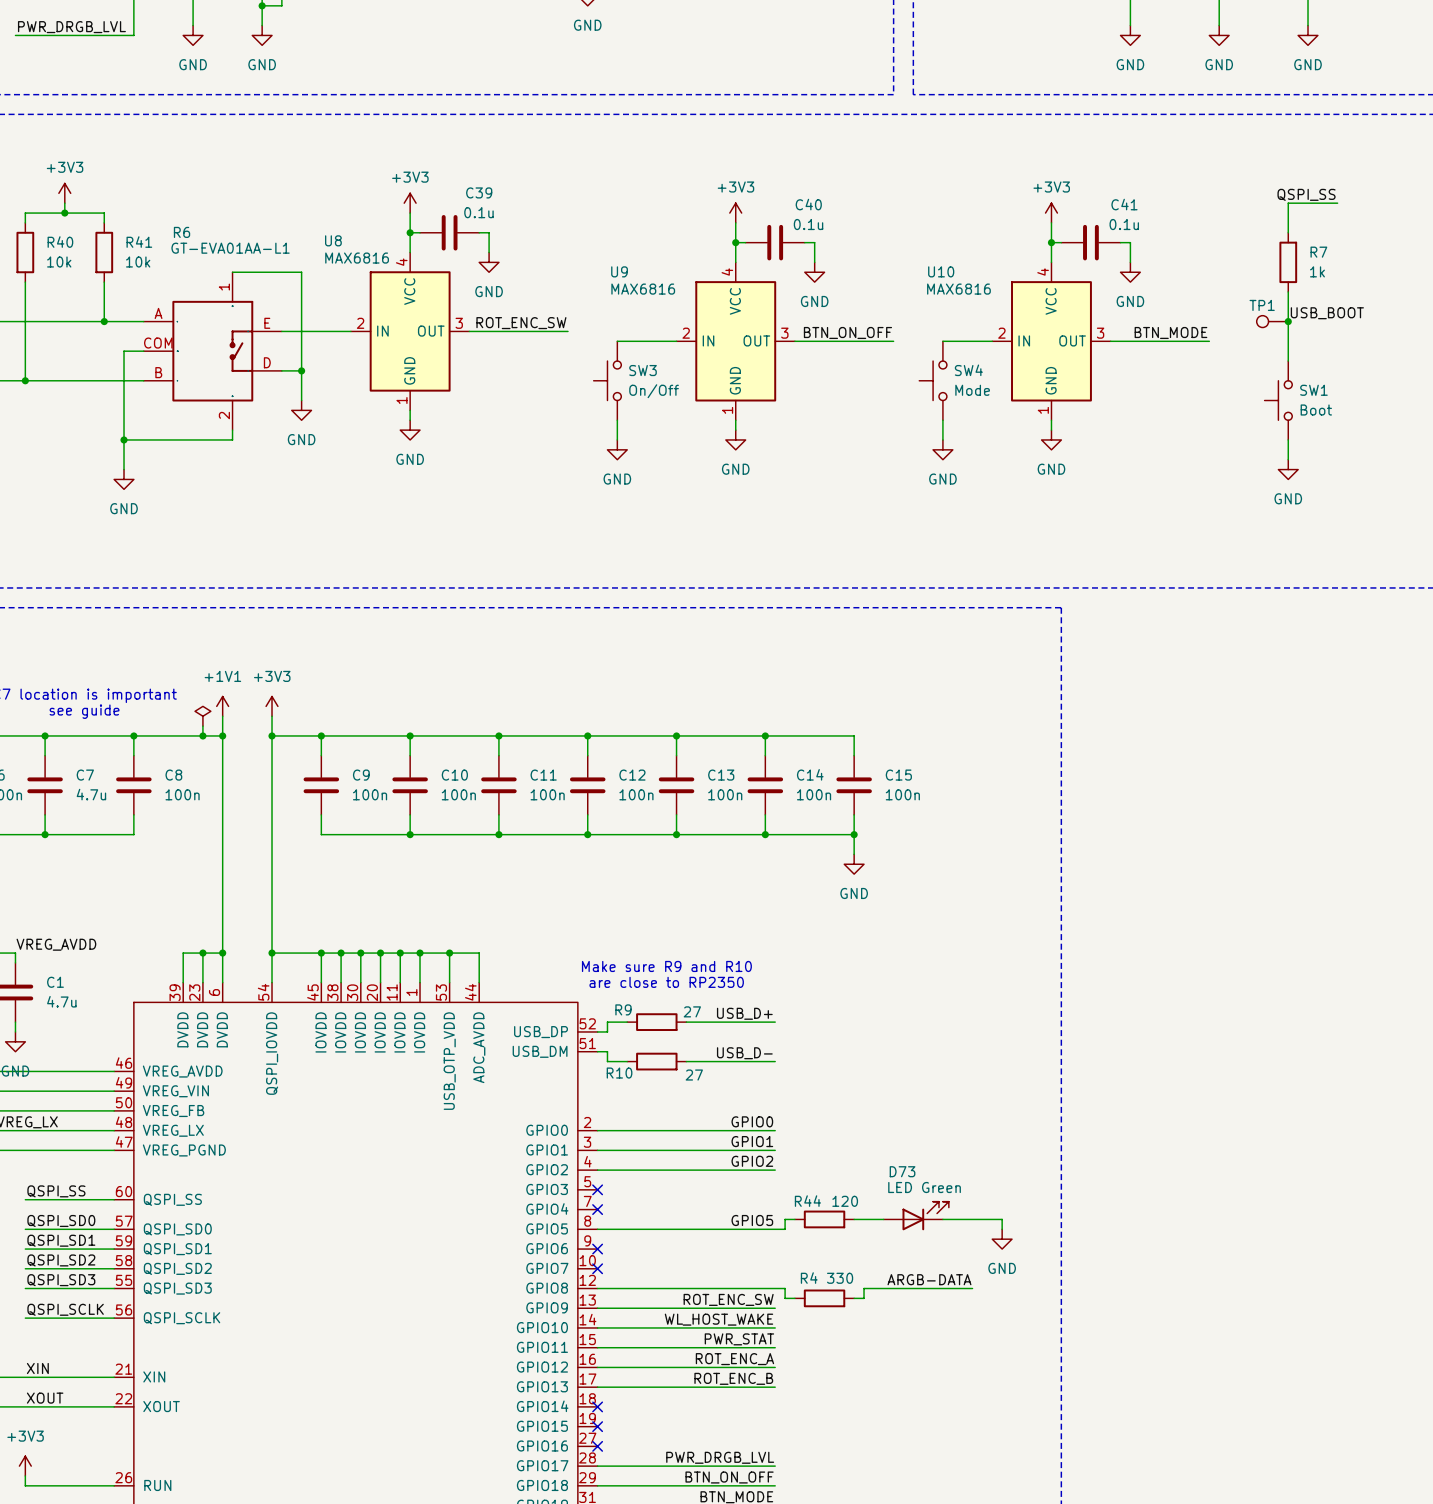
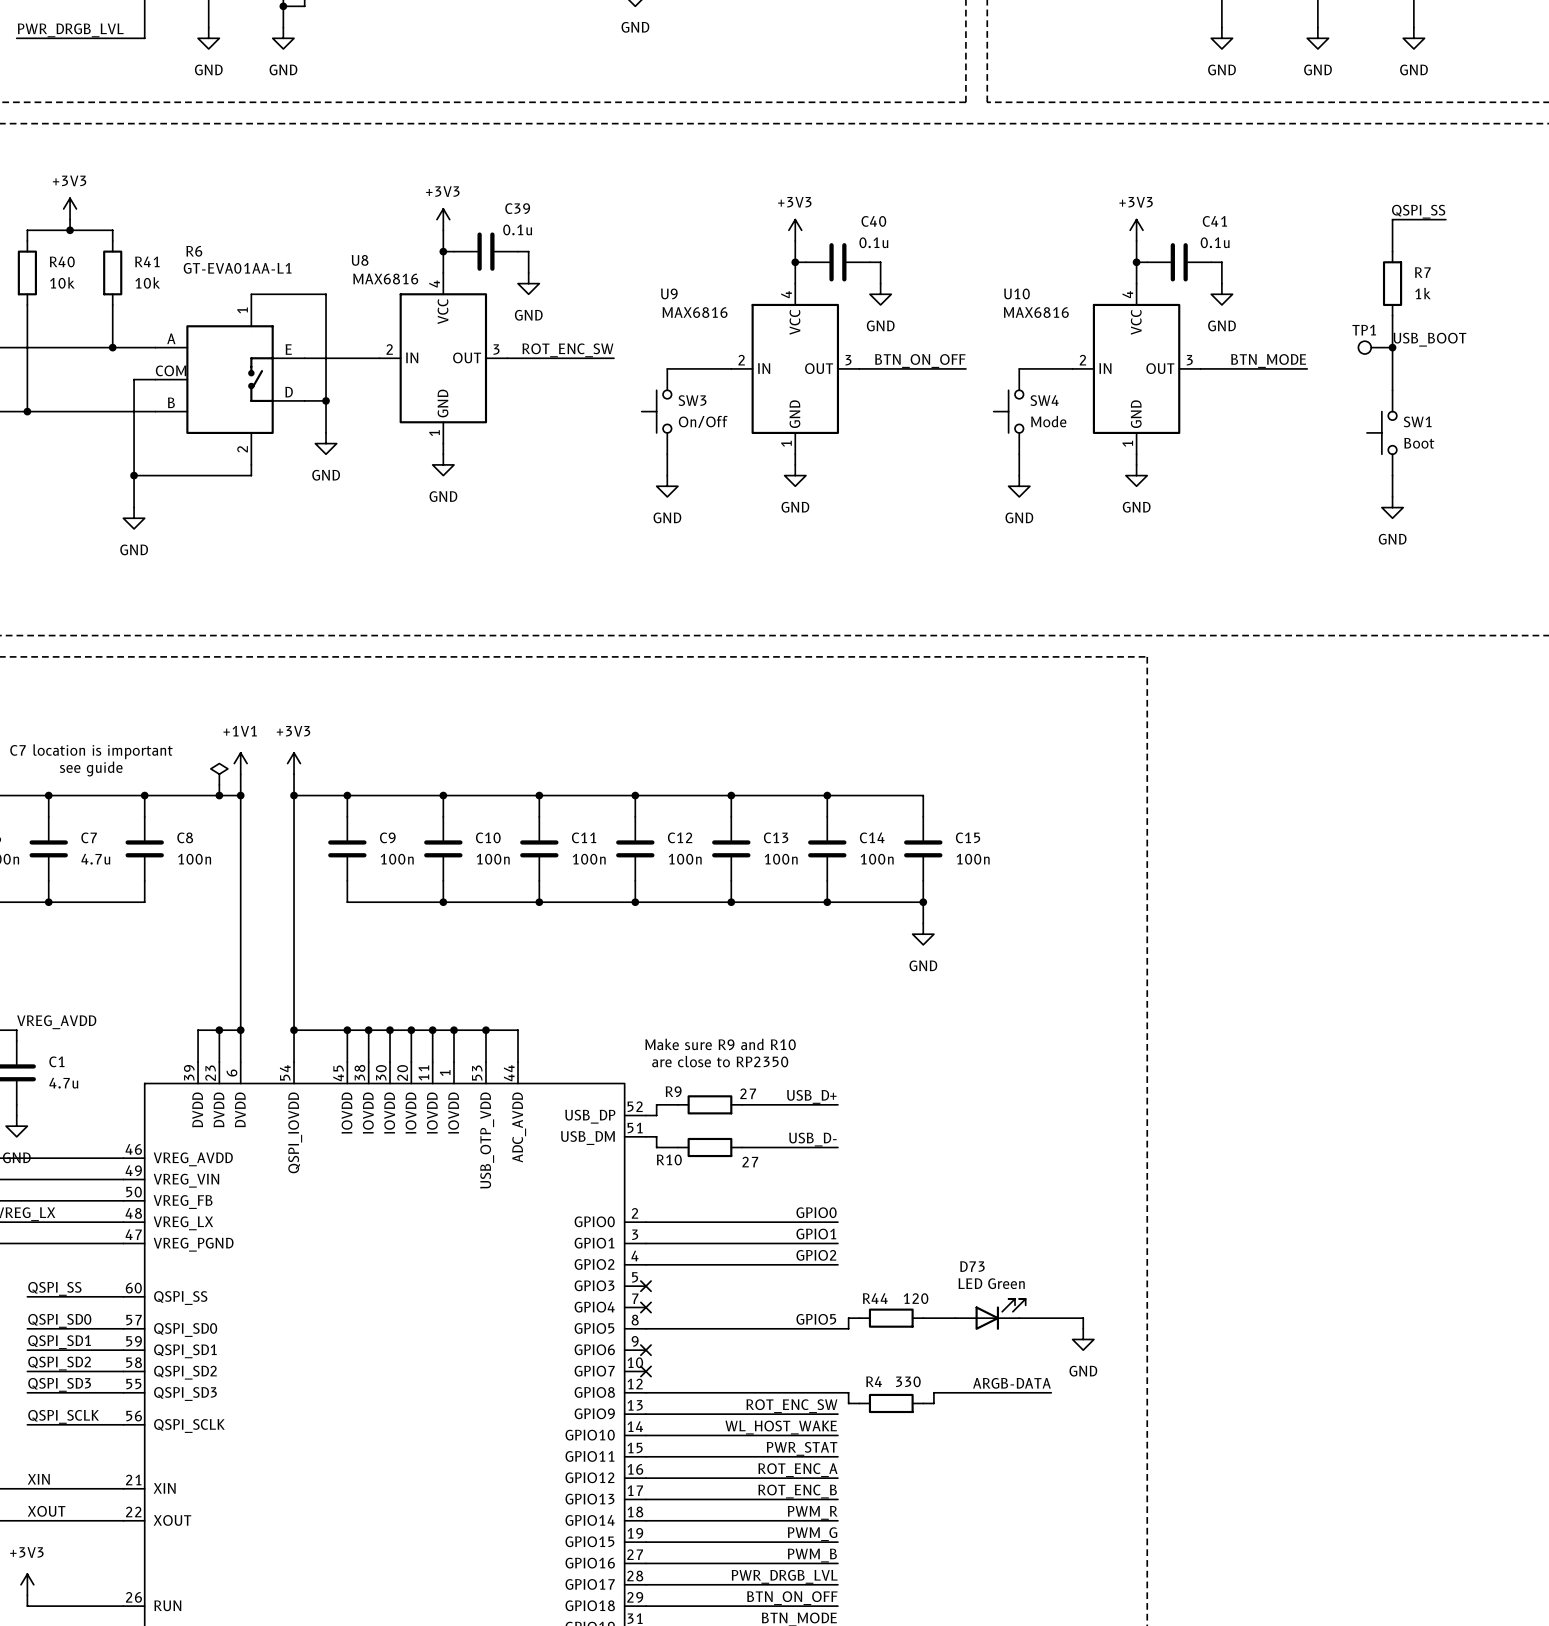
label: none -> PWM_R (812, 1512)
wire: none -> (645, 1520) (837, 1520)
no-connect mark: (597, 1406) -> none
label: none -> PWM_G (812, 1534)
wire: none -> (645, 1542) (837, 1542)
no-connect mark: (597, 1426) -> none
label: none -> PWM_B (812, 1555)
wire: none -> (645, 1563) (837, 1563)
no-connect mark: (597, 1446) -> none

